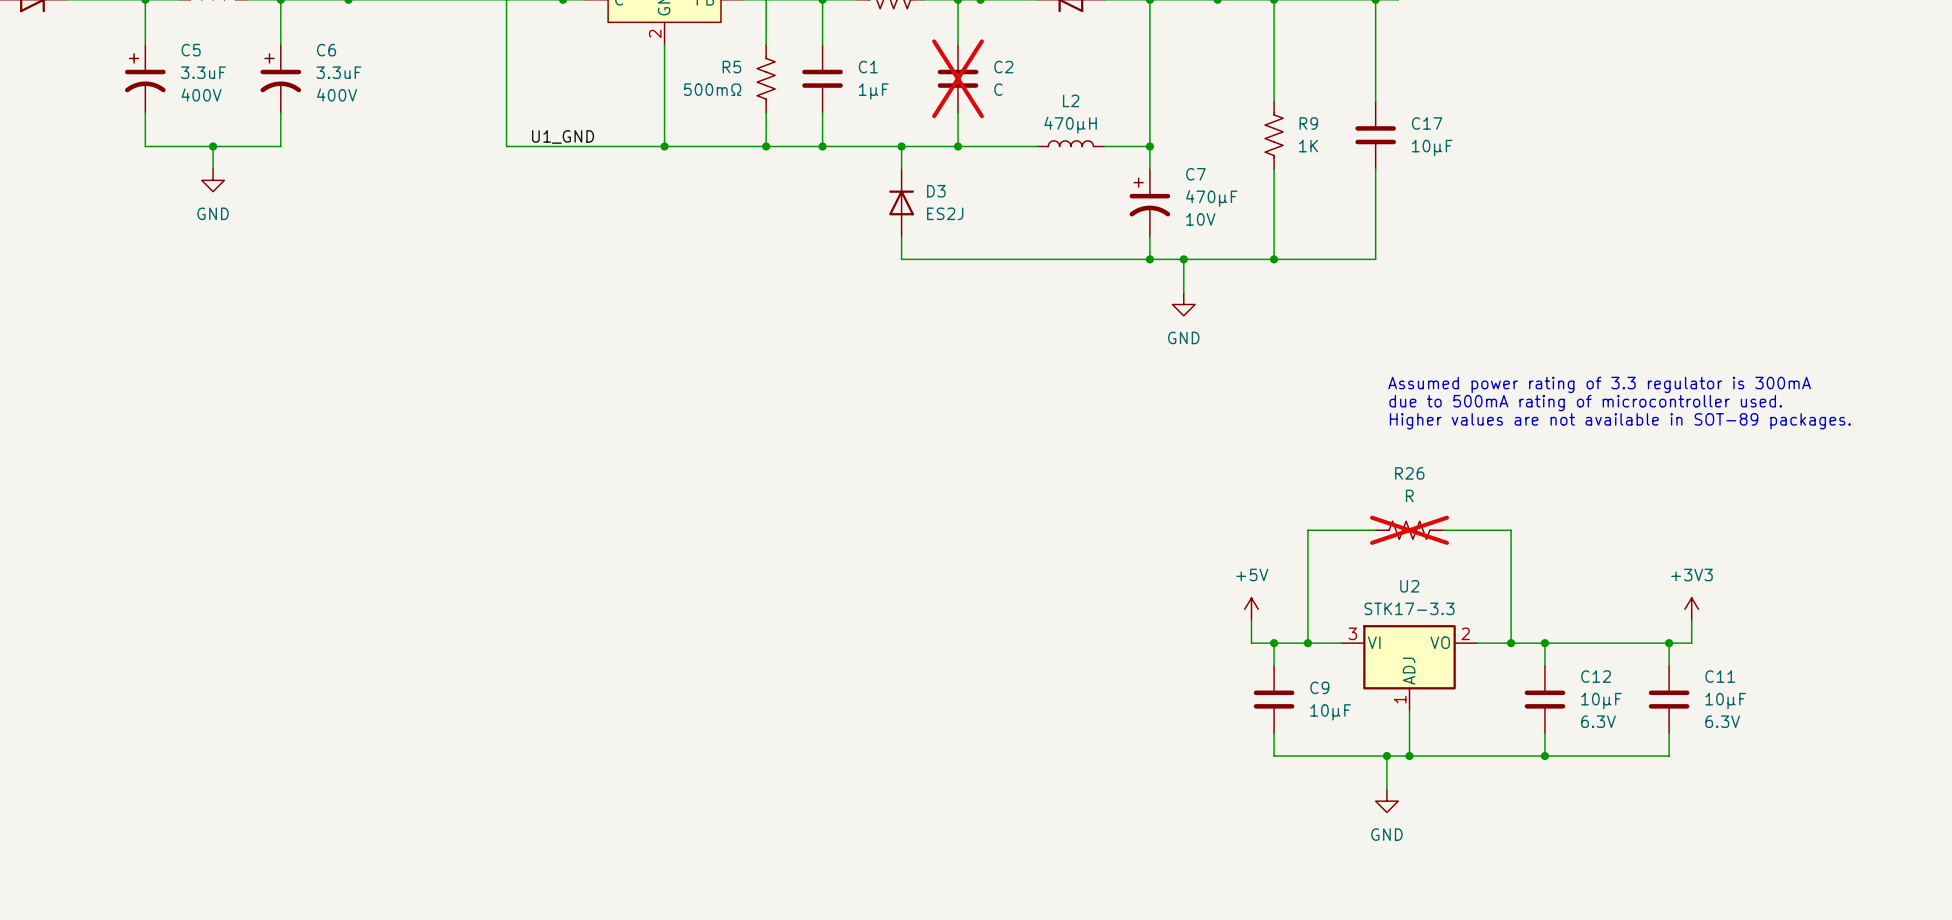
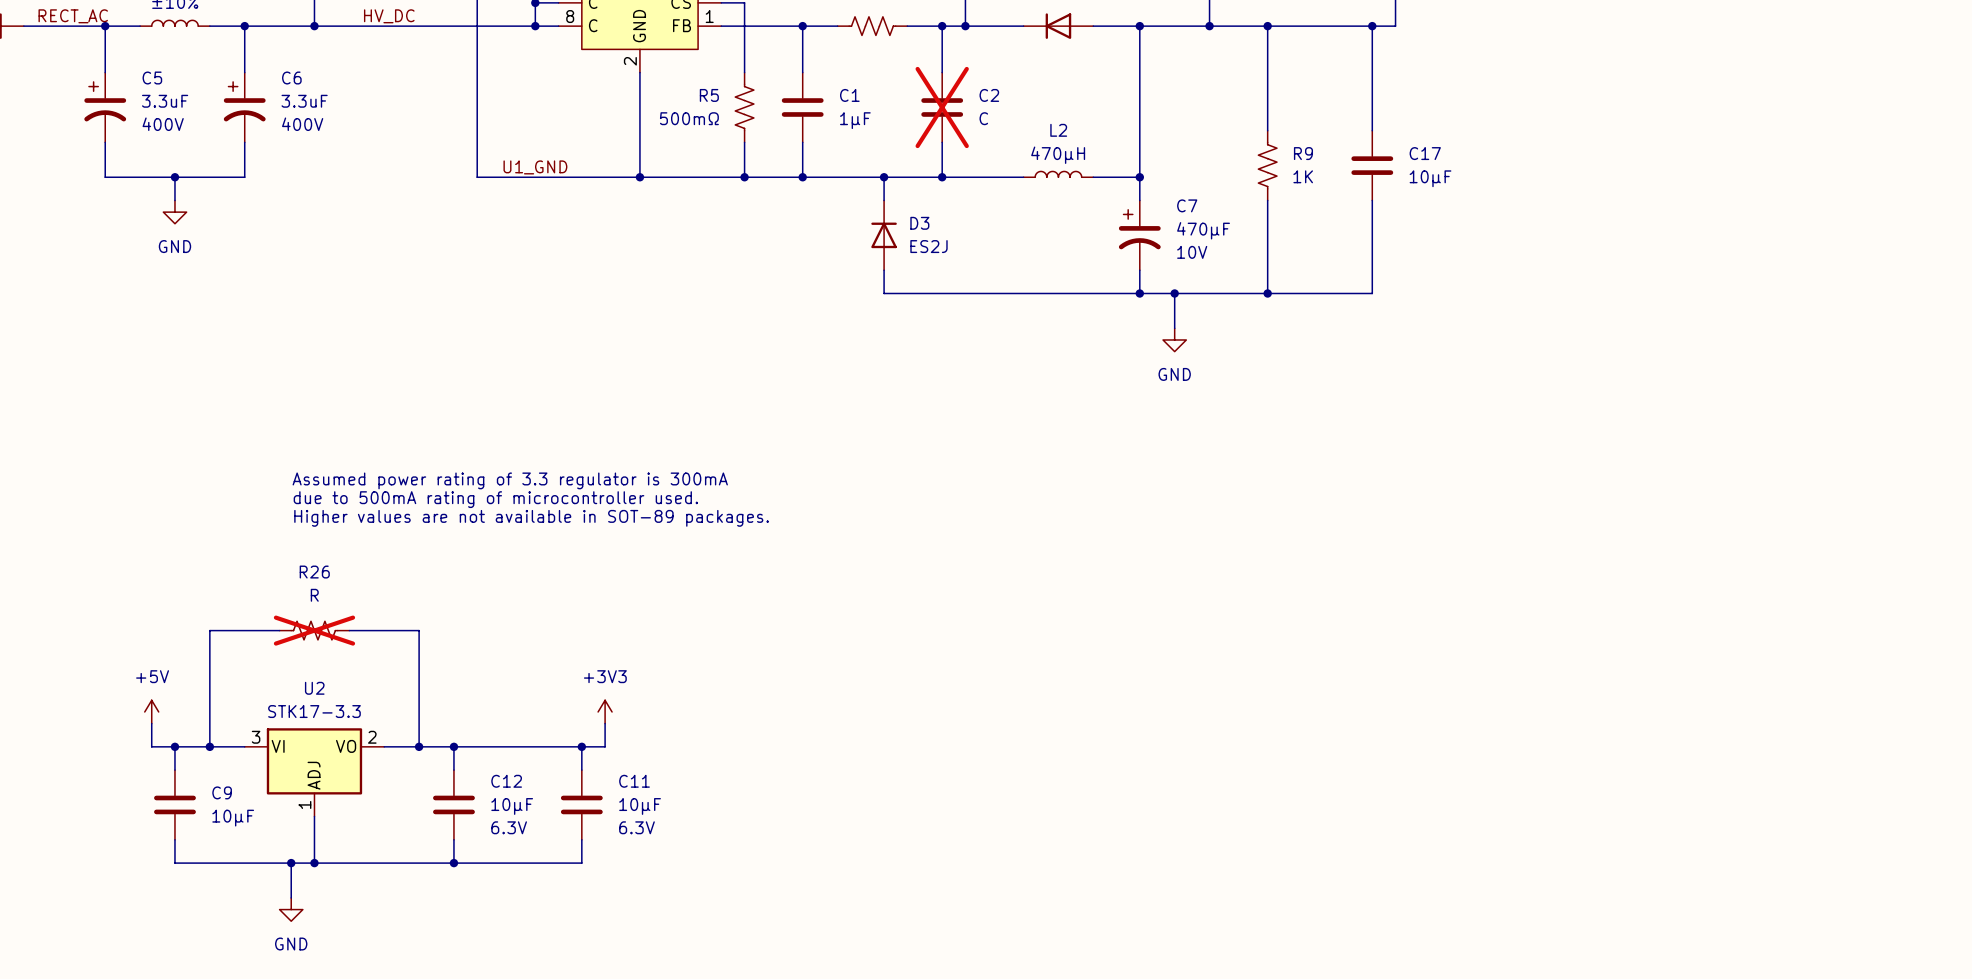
text: Assumed power rating of 3.3 regulator is 300mA (1599, 384) -> none
text: due to 500mA rating of microcontroller used. (1585, 403) -> none
text: Higher values are not available in SOT-89 packages. (1620, 421) -> none
text: none -> Assumed power rating of 3.3 regulator is 300mA (510, 480)
text: none -> due to 500mA rating of microcontroller used. (495, 499)
text: none -> Higher values are not available in SOT-89 packages. (531, 518)
wire: (1375, 530) (1307, 530) (1307, 643) -> none
R26 position: (1409, 530) -> (314, 630)
wire: (1443, 530) (1511, 530) (1511, 643) -> none
wire: none -> (279, 630) (209, 630) (209, 746)
wire: none -> (349, 630) (419, 630) (419, 746)
power symbol: +5V (1251, 609) -> none
power symbol: +3V3 (1691, 609) -> none
wire: (1251, 620) (1251, 643) (1341, 643) -> none
wire: (1691, 620) (1691, 643) (1477, 643) -> none
wire: (1274, 643) (1274, 665) -> none
junction: (1274, 643) -> none
junction: (1307, 643) -> none
junction: (1511, 643) -> none
wire: (1544, 643) (1544, 665) -> none
junction: (1544, 643) -> none
wire: (1669, 643) (1669, 665) -> none
junction: (1669, 643) -> none
power symbol: none -> +5V (151, 711)
power symbol: none -> +3V3 (605, 711)
U2 position: (1409, 667) -> (314, 772)
wire: none -> (151, 723) (151, 746) (244, 746)
wire: none -> (605, 723) (605, 746) (384, 746)
wire: none -> (174, 746) (174, 770)
junction: none -> (174, 746)
junction: none -> (209, 746)
junction: none -> (419, 746)
wire: none -> (453, 746) (453, 770)
junction: none -> (453, 746)
wire: none -> (581, 746) (581, 770)
junction: none -> (581, 746)
C9 position: (1274, 699) -> (174, 804)
C12 position: (1544, 699) -> (453, 804)
C11 position: (1669, 699) -> (581, 804)
wire: (1409, 710) (1409, 756) -> none
wire: (1274, 733) (1274, 756) (1669, 756) (1669, 733) -> none
wire: (1544, 733) (1544, 756) -> none
wire: (1386, 756) (1386, 789) -> none
junction: (1386, 756) -> none
junction: (1409, 756) -> none
junction: (1544, 756) -> none
wire: none -> (314, 816) (314, 863)
wire: none -> (174, 839) (174, 863) (581, 863) (581, 839)
wire: none -> (453, 839) (453, 863)
power symbol: GND (1386, 801) -> none
wire: none -> (291, 863) (291, 897)
junction: none -> (291, 863)
junction: none -> (314, 863)
junction: none -> (453, 863)
power symbol: none -> GND (291, 909)

